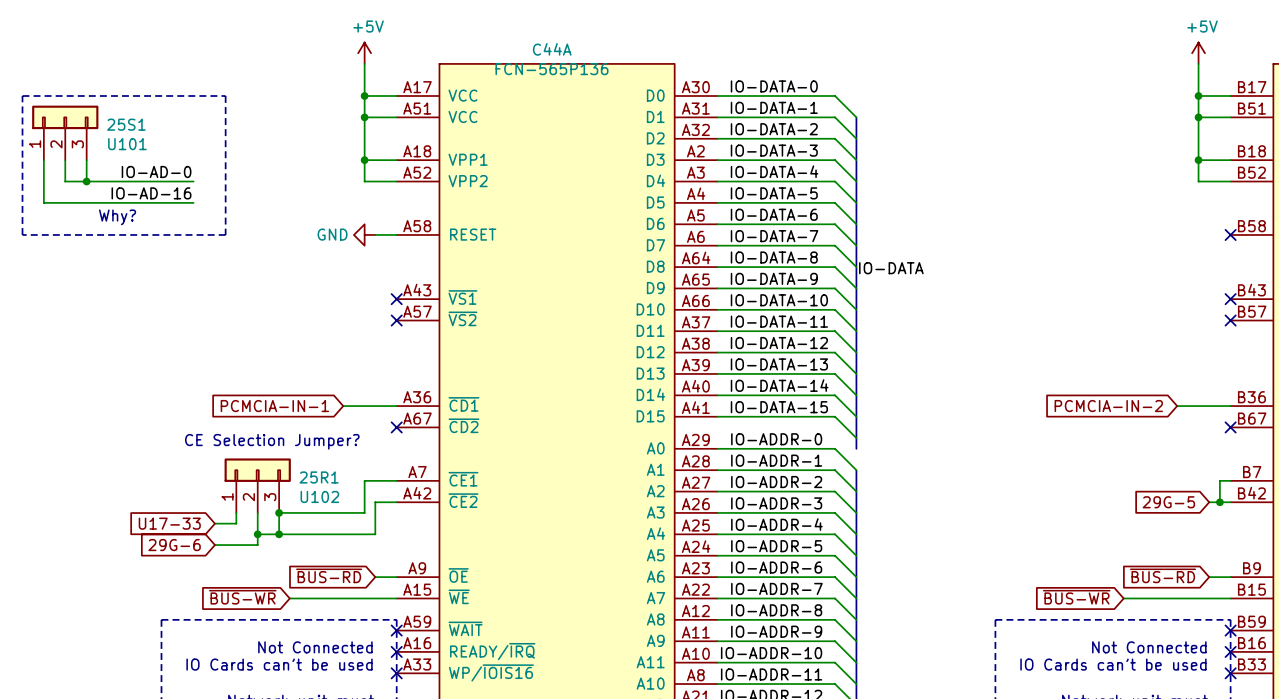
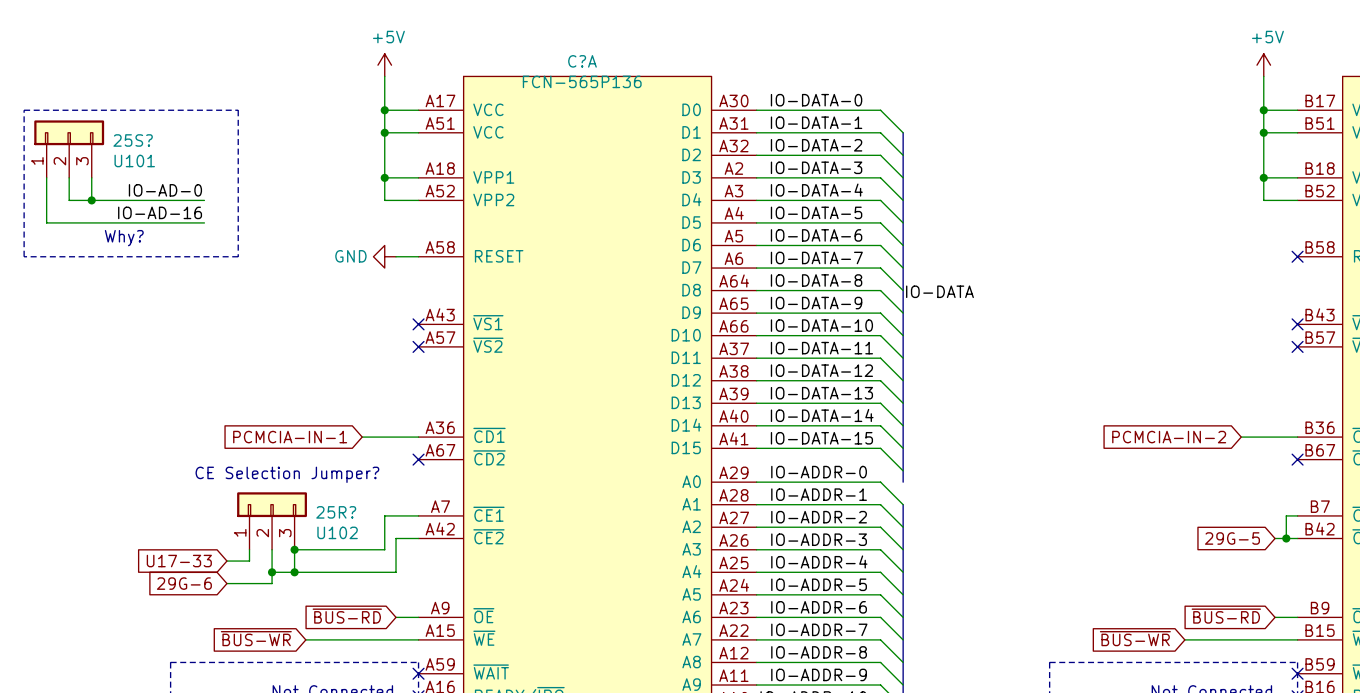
C44A name: C44A (552, 49) -> C?A (582, 61)
25S1 name: 25S1 (126, 124) -> 25S? (133, 140)
25R1 name: 25R1 (319, 477) -> 25R? (336, 512)

